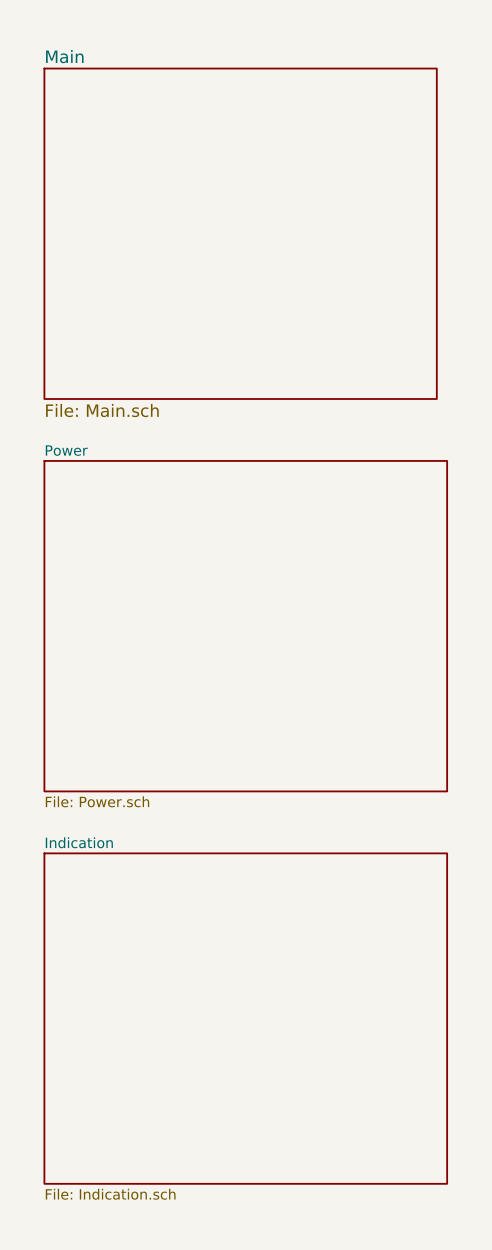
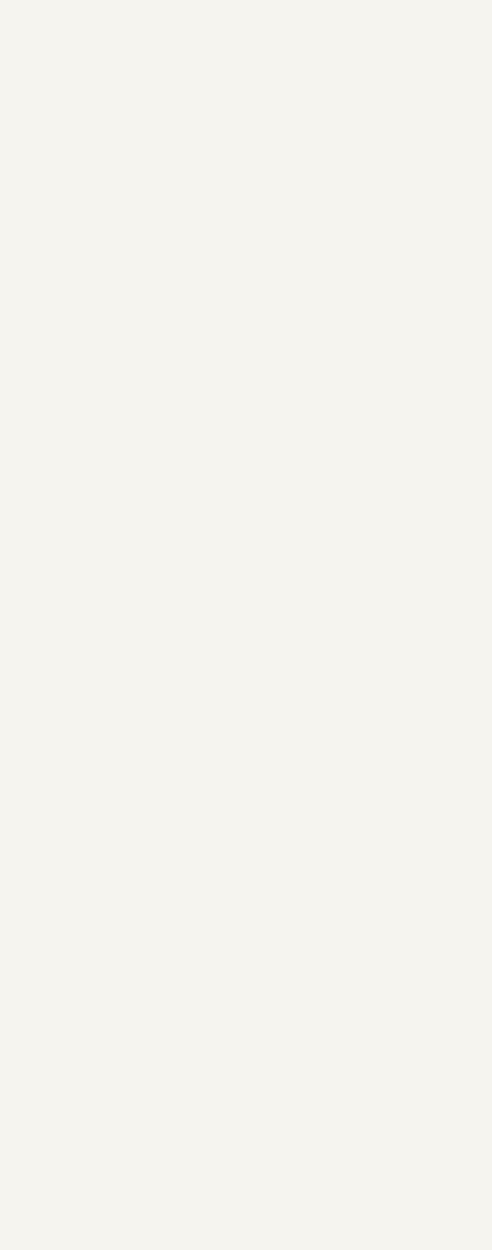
sheet Main: File: Main.sch (240, 233) -> none
sheet Power: File: Power.sch (245, 626) -> none
sheet Indication: File: Indication.sch (245, 1018) -> none

